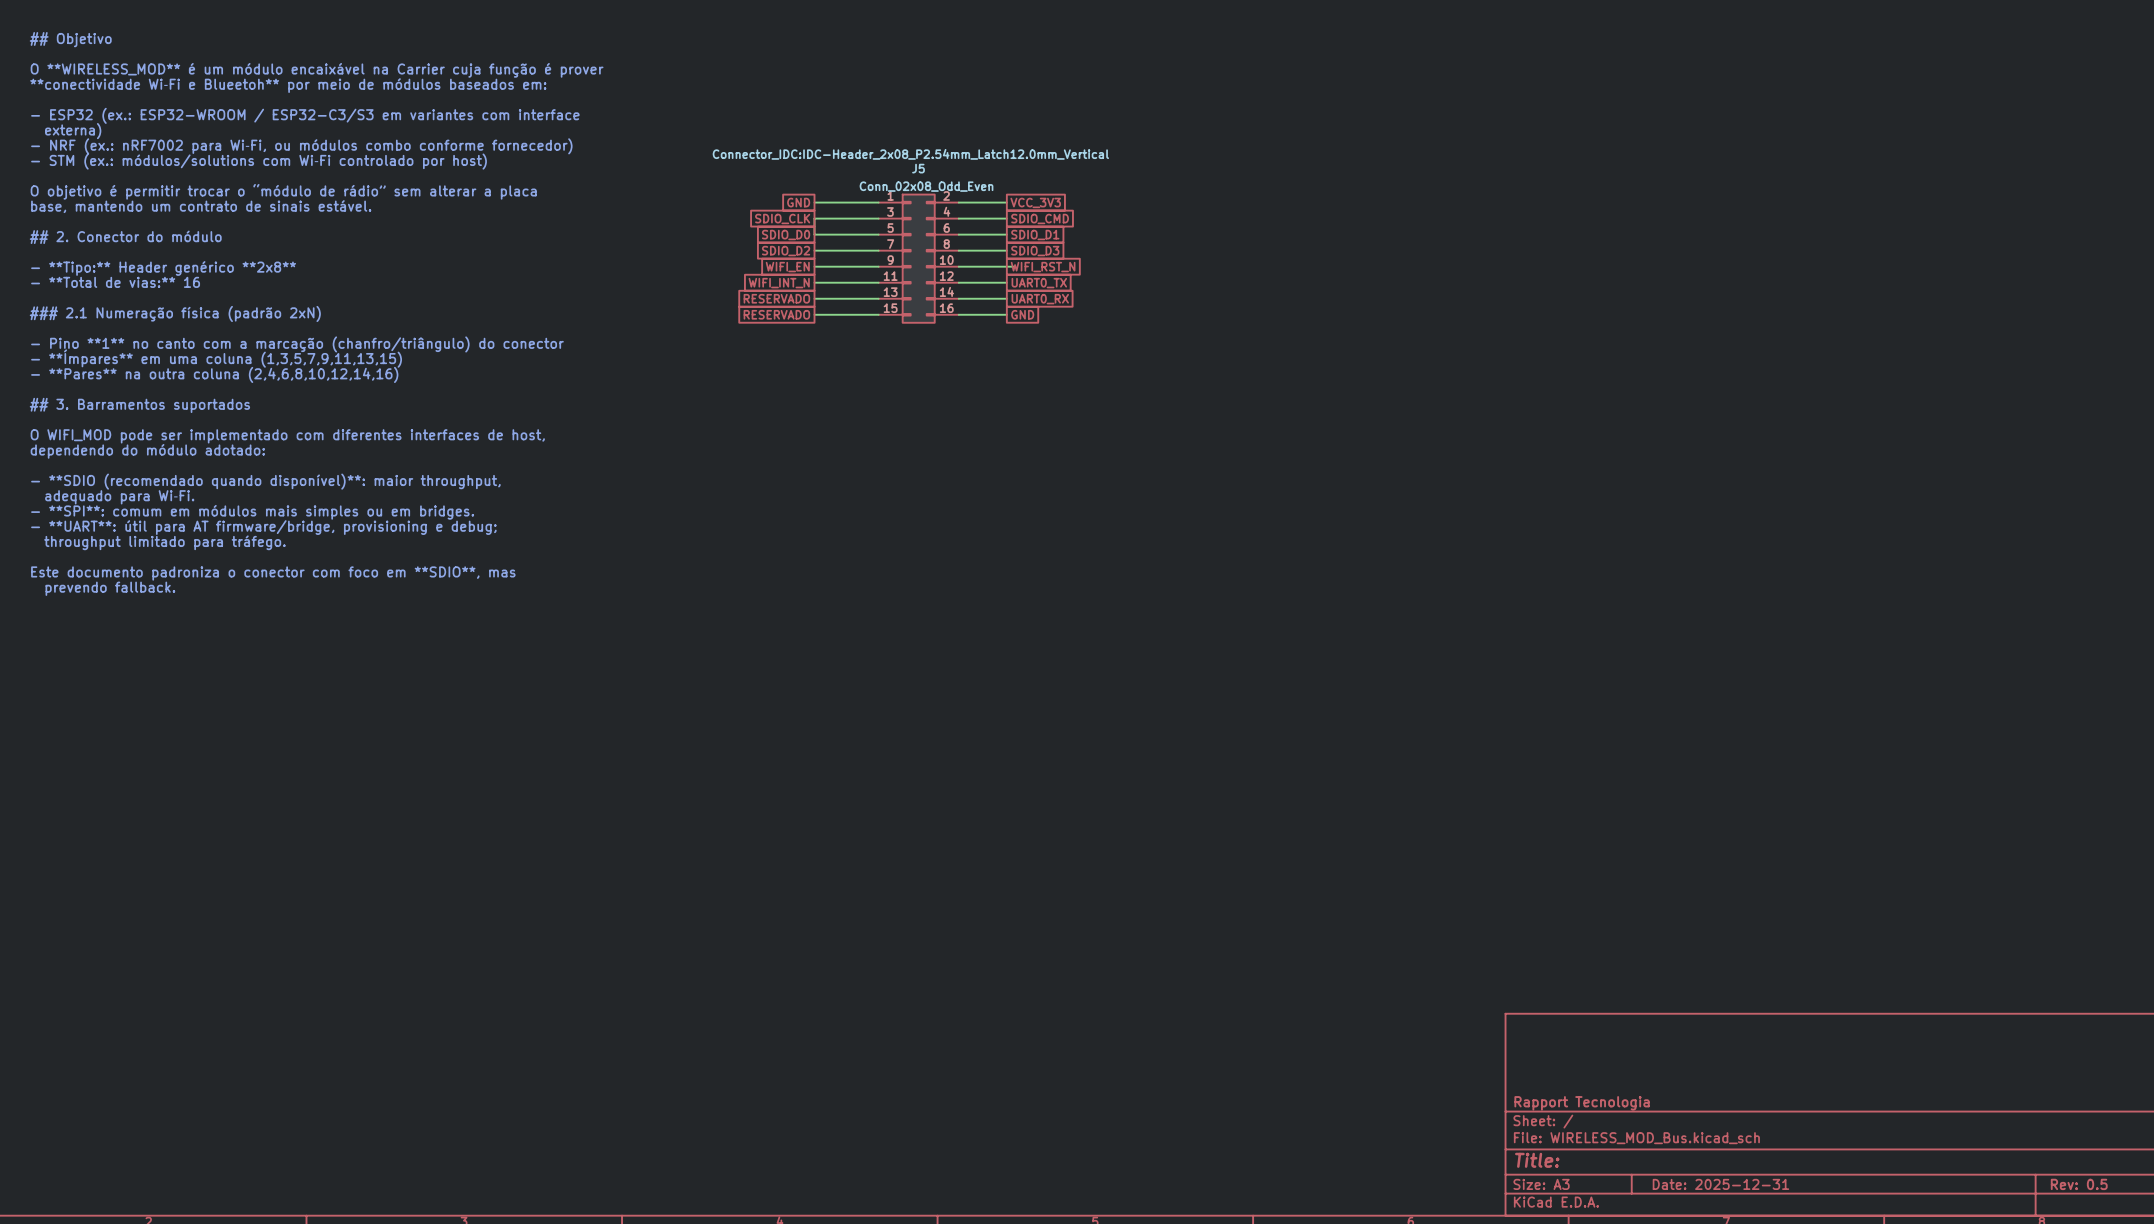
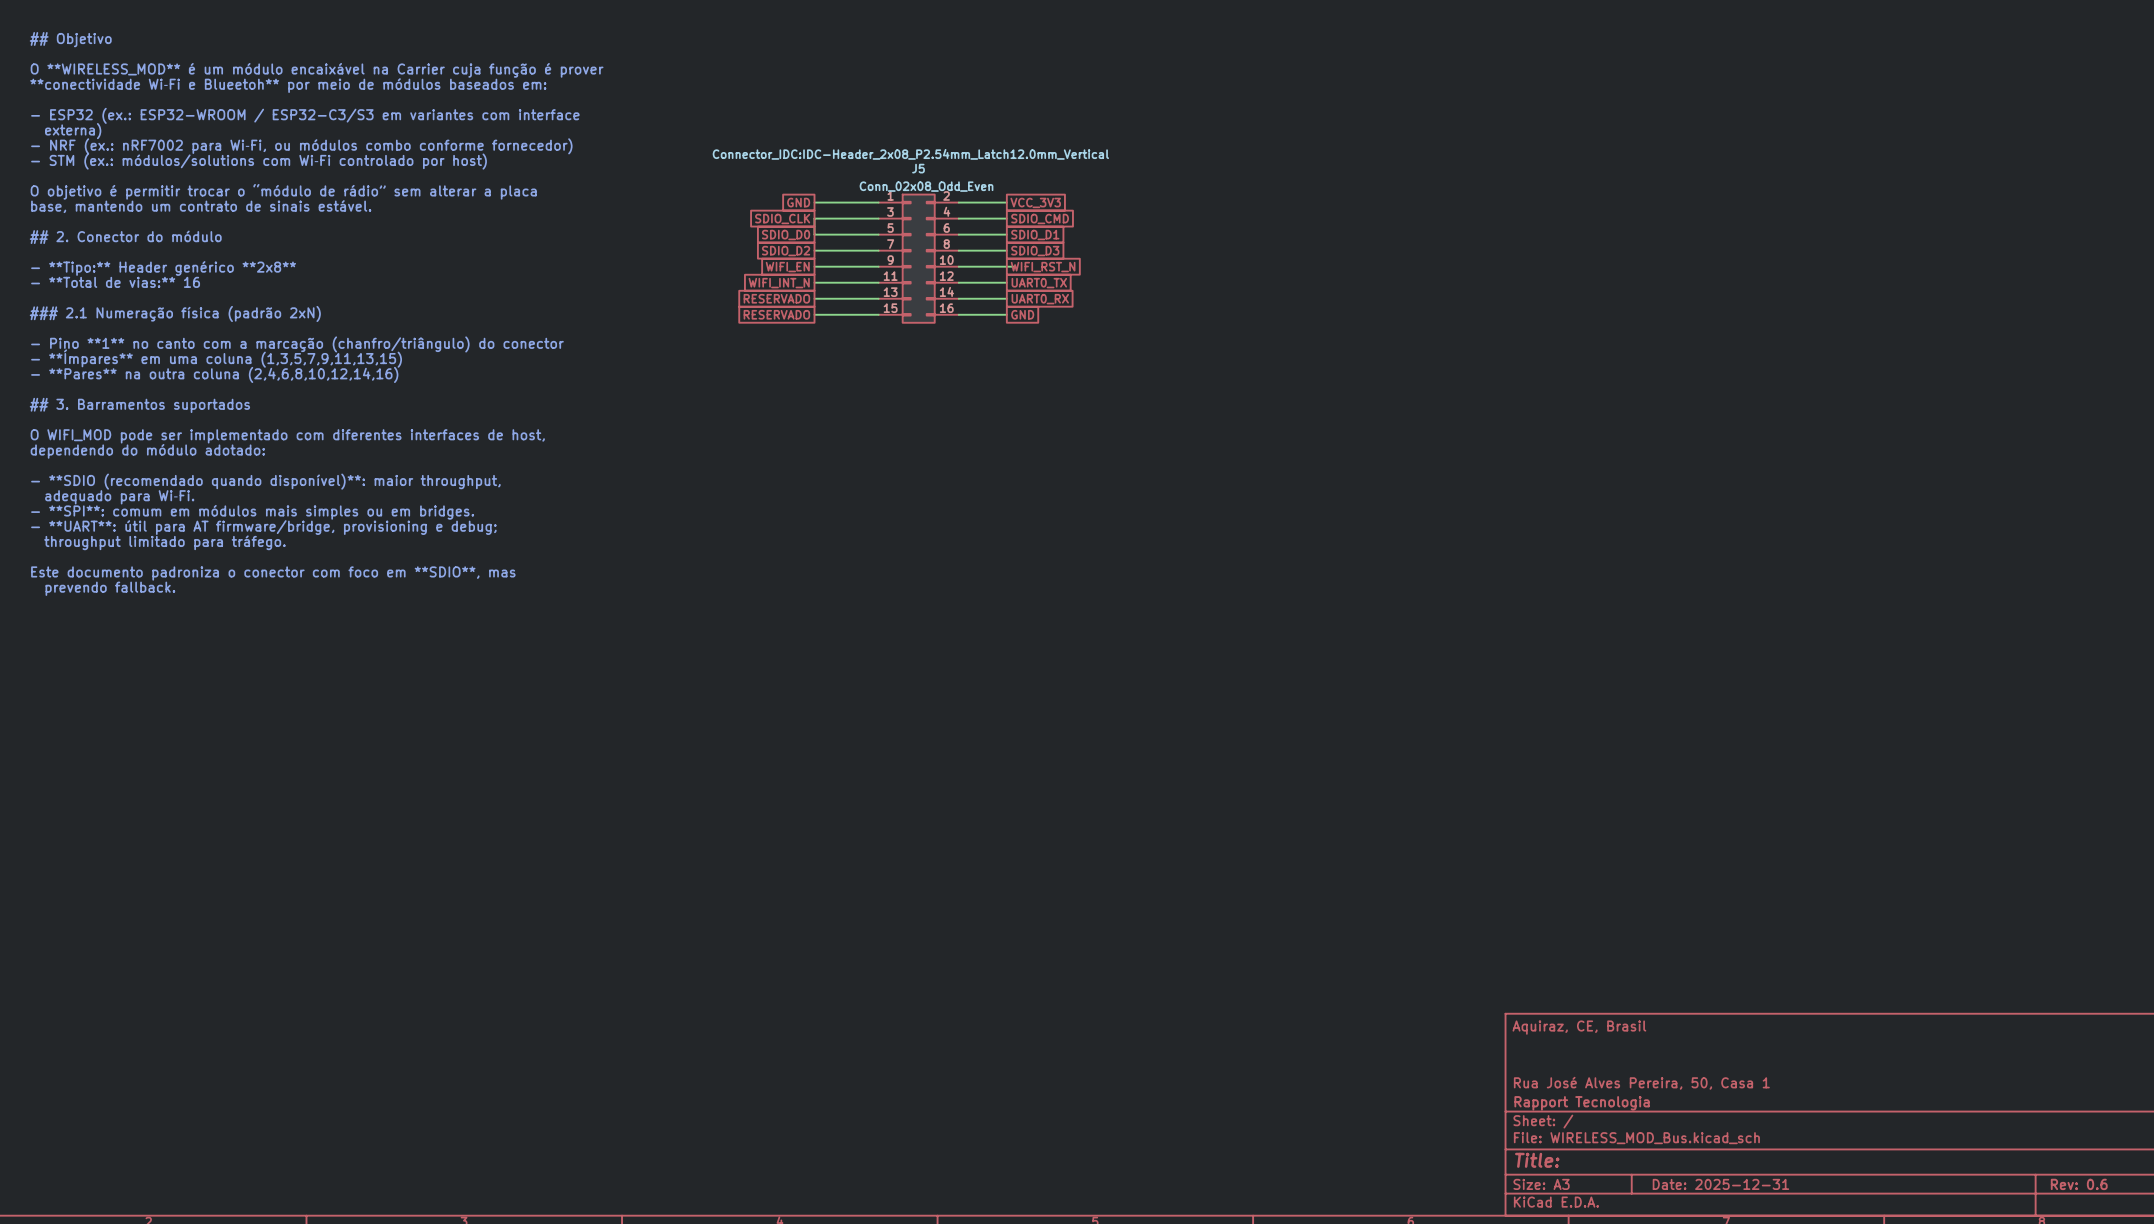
title block: none -> Aquiraz, CE, Brasil (1579, 1027)
title block: none -> Rua José Alves Pereira, 50, Casa 1 (1641, 1083)
title block: Rev: 0.5 (2079, 1184) -> Rev: 0.6 (2079, 1184)

